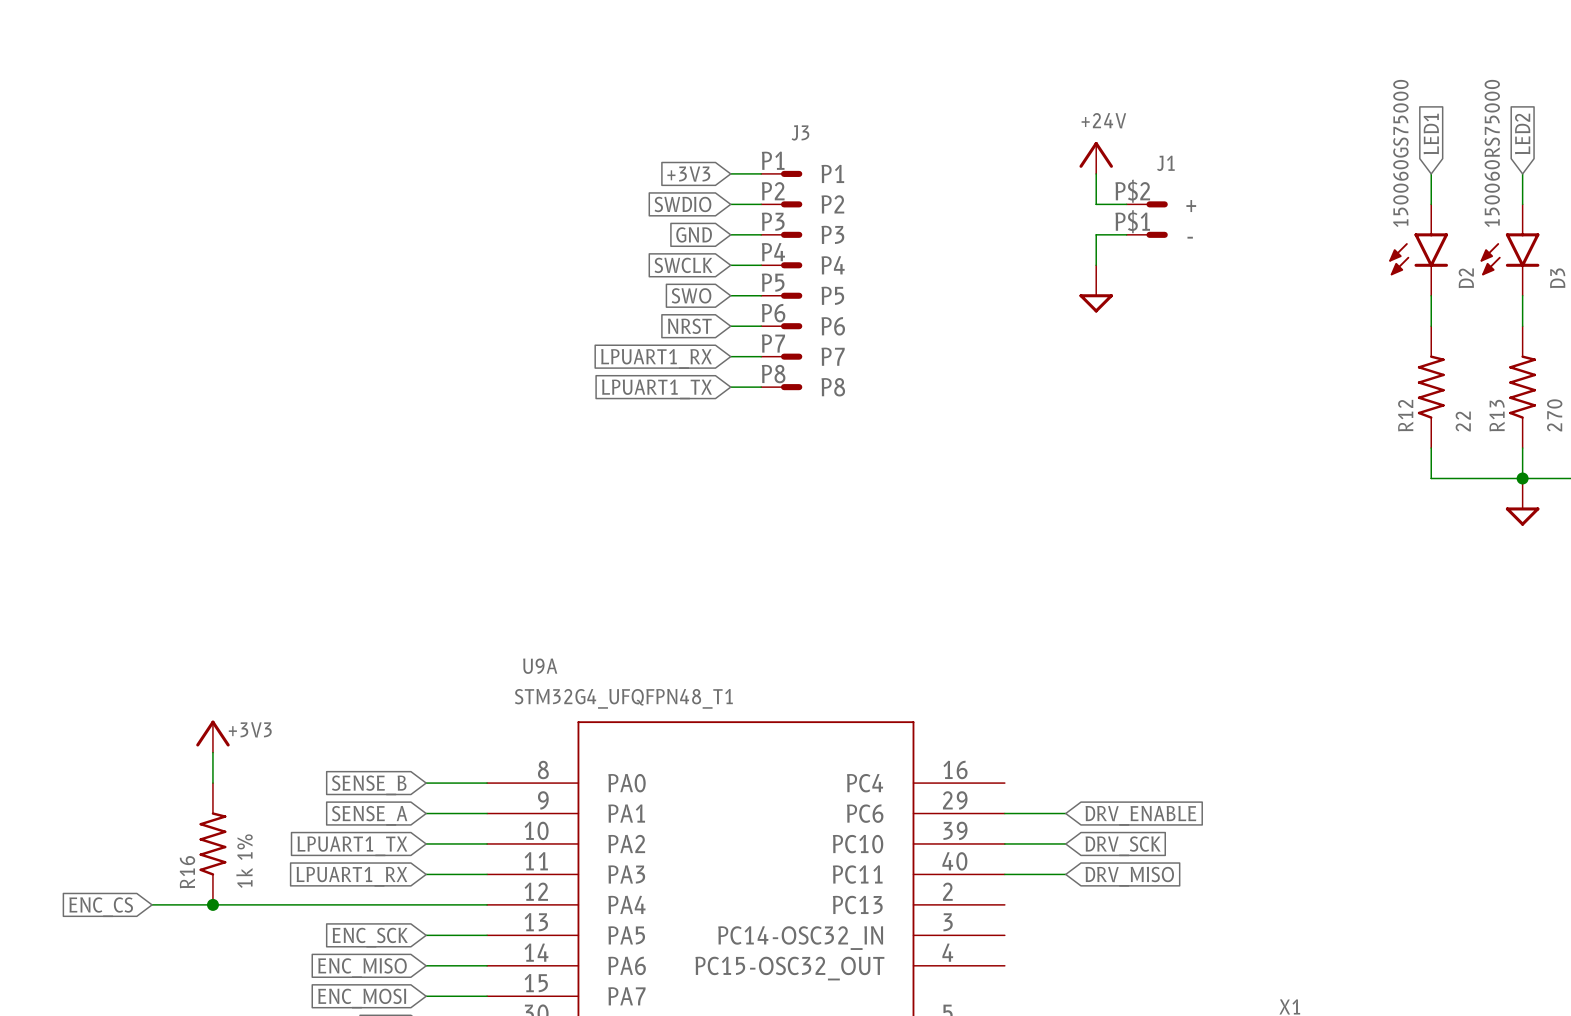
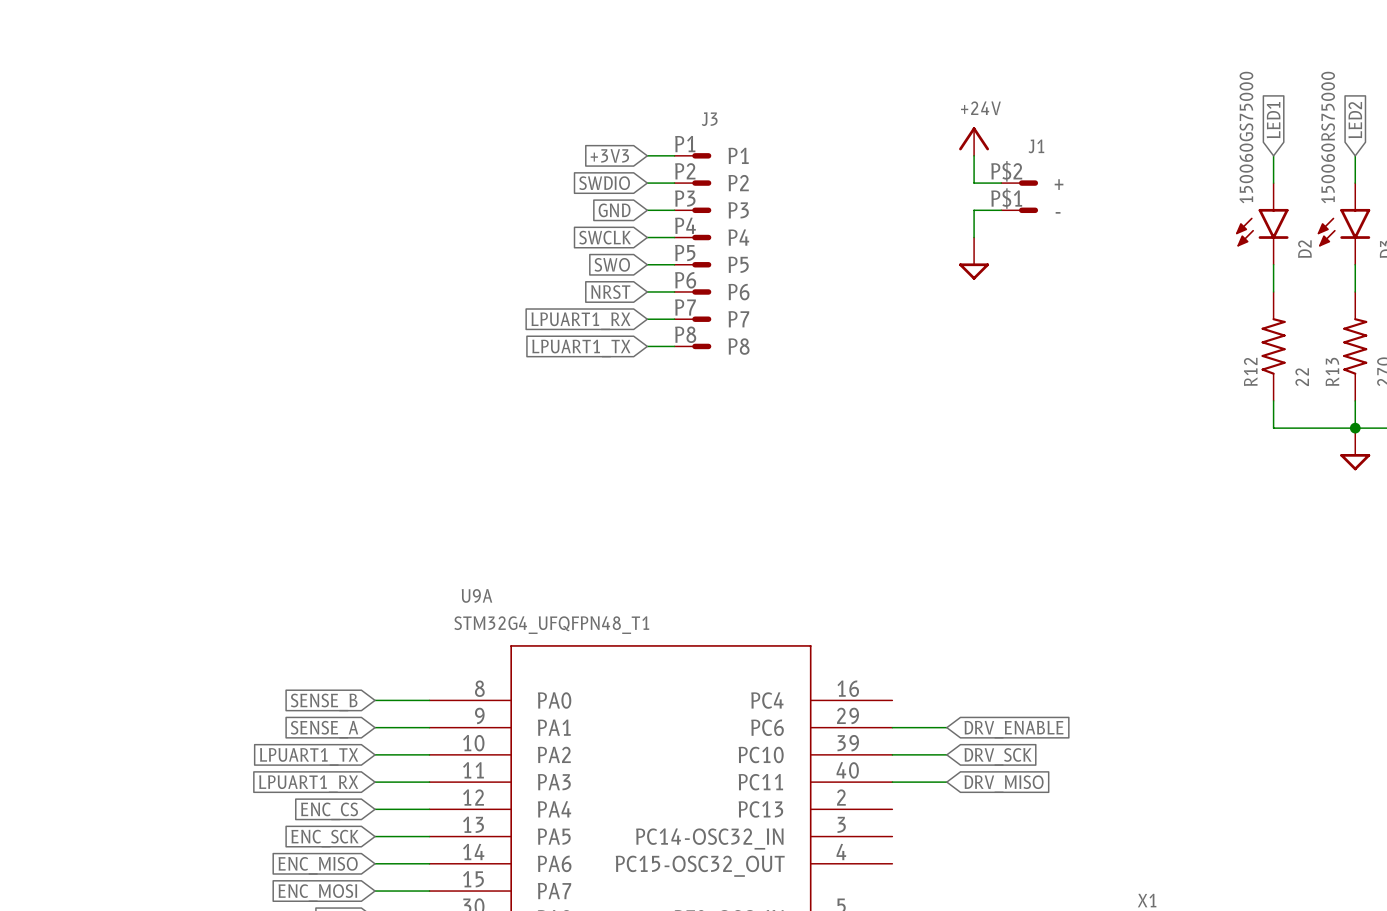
power symbol: +3V3 (212, 736) -> none
wire: (212, 752) (212, 783) -> none
R16: 1k 1% (212, 843) -> none
wire: (152, 904) (426, 904) -> none
junction: (212, 904) -> none
global label position: ENC_CS (101, 907) -> ENC_CS (329, 811)

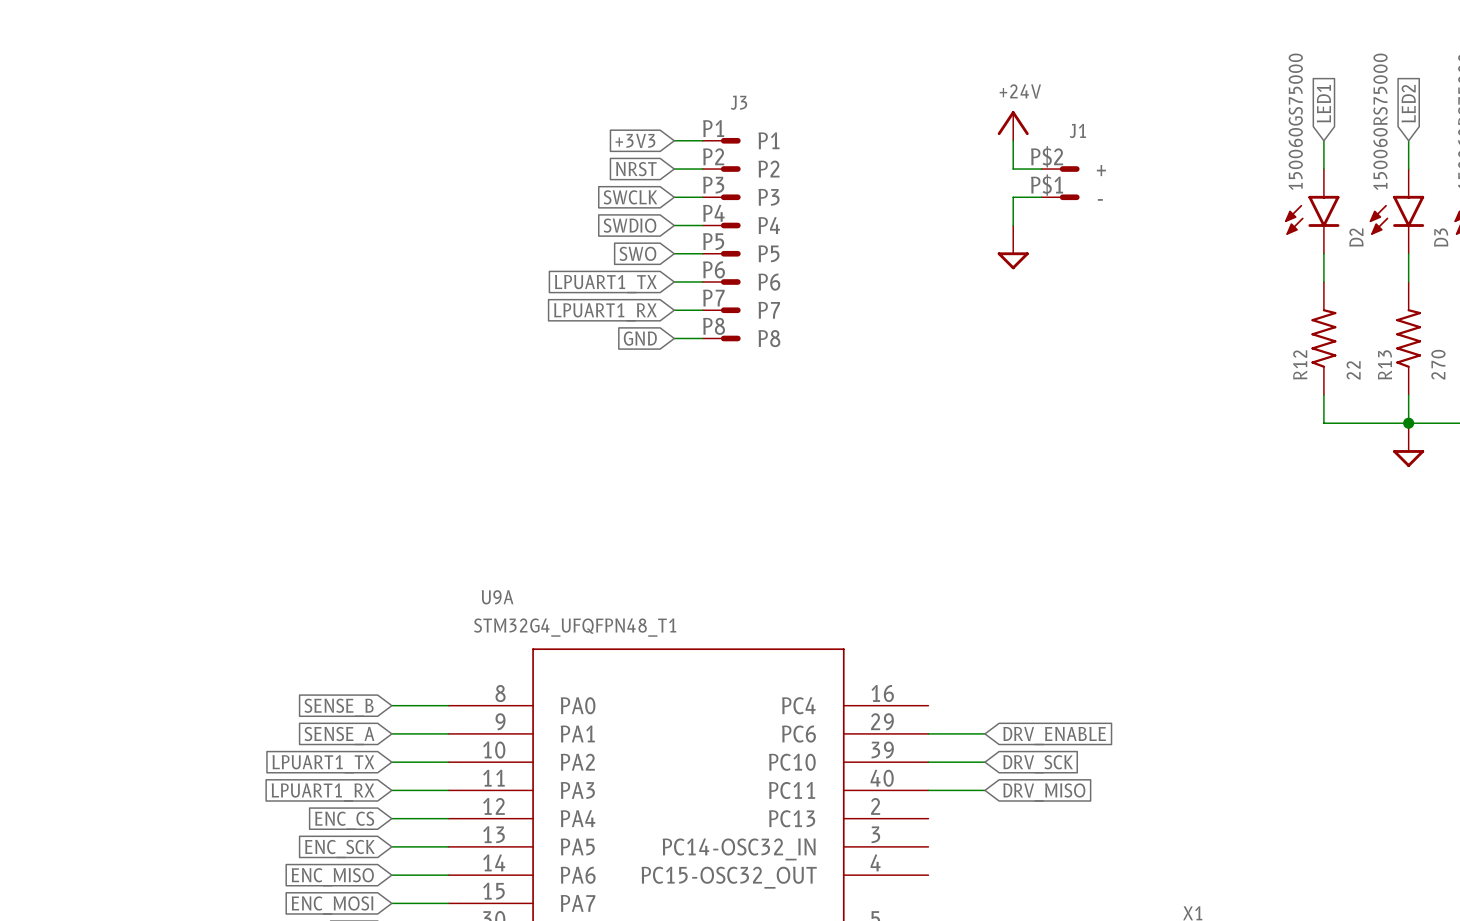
global label: SWDIO (604, 183) -> NRST (636, 169)
global label: GND (614, 210) -> SWCLK (630, 197)
global label: SWCLK (605, 237) -> SWDIO (629, 225)
global label: NRST (610, 292) -> LPUART1_TX (605, 284)
global label: LPUART1_TX (581, 348) -> GND (640, 338)

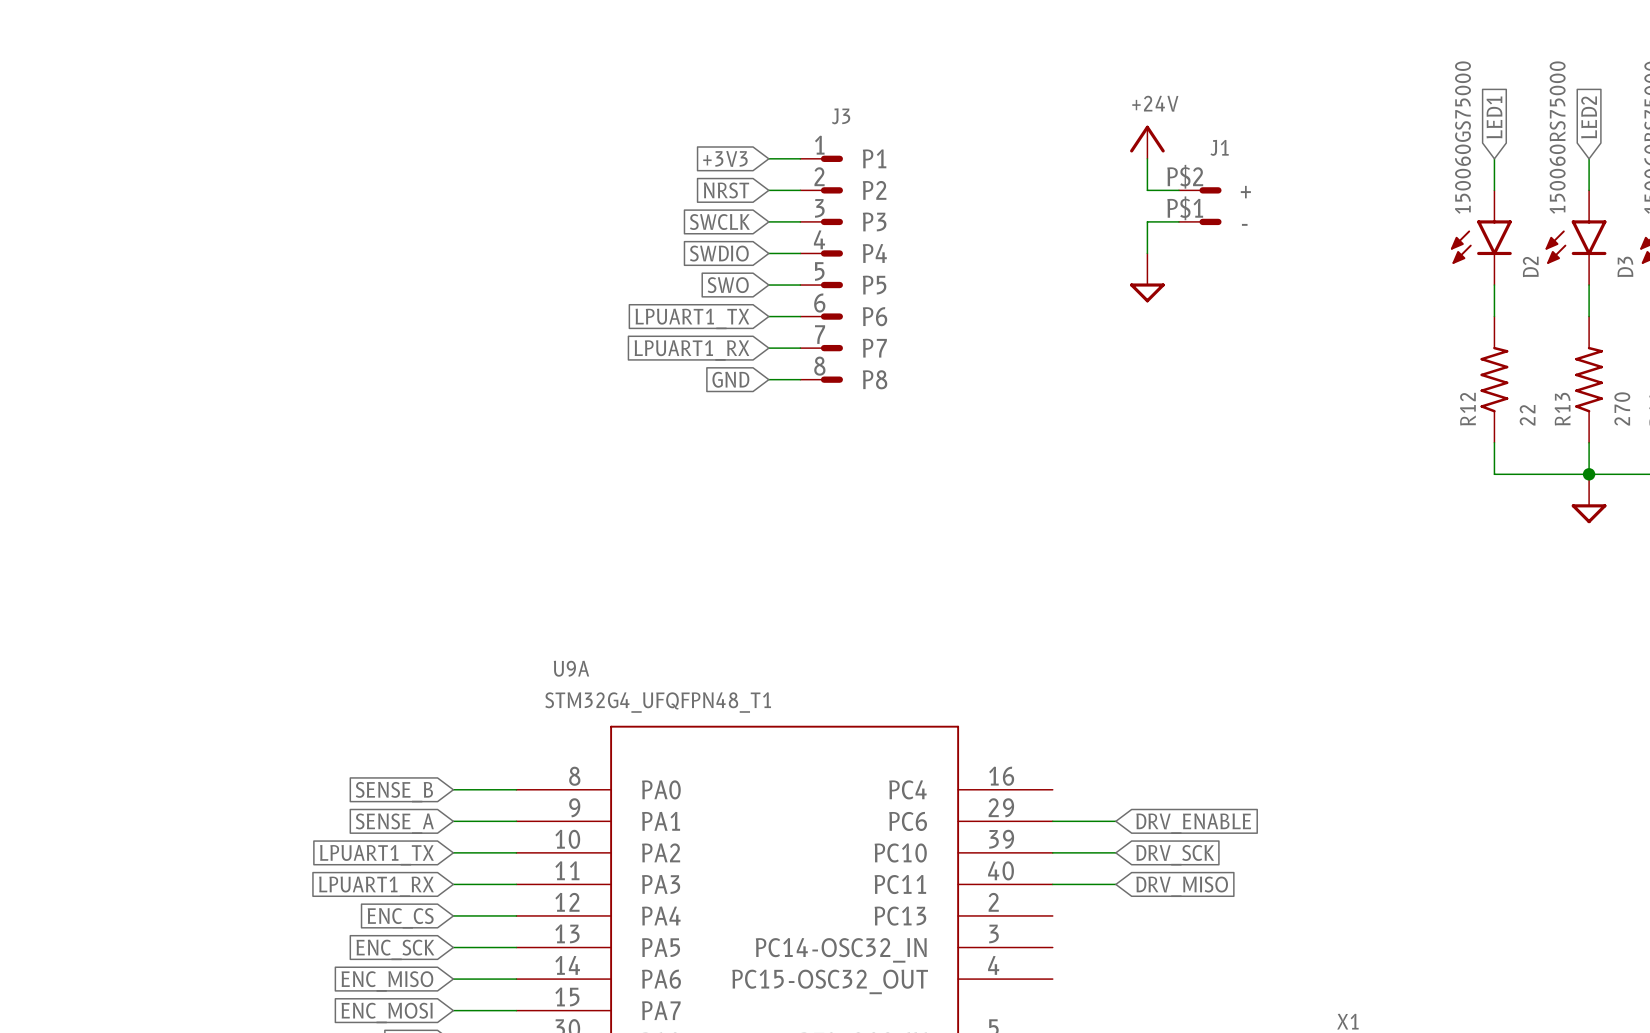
J3 pin number: P1 (713, 128) -> 1 (819, 145)
J3 pin number: P2 (713, 156) -> 2 (819, 176)
J3 pin number: P3 (713, 185) -> 3 (819, 208)
J3 pin number: P4 (713, 213) -> 4 (819, 239)
J3 pin number: P5 (713, 241) -> 5 (819, 271)
J3 pin number: P6 (714, 269) -> 6 (819, 303)
J3 pin number: P7 (713, 298) -> 7 (820, 334)
J3 pin number: P8 (714, 326) -> 8 (819, 366)

